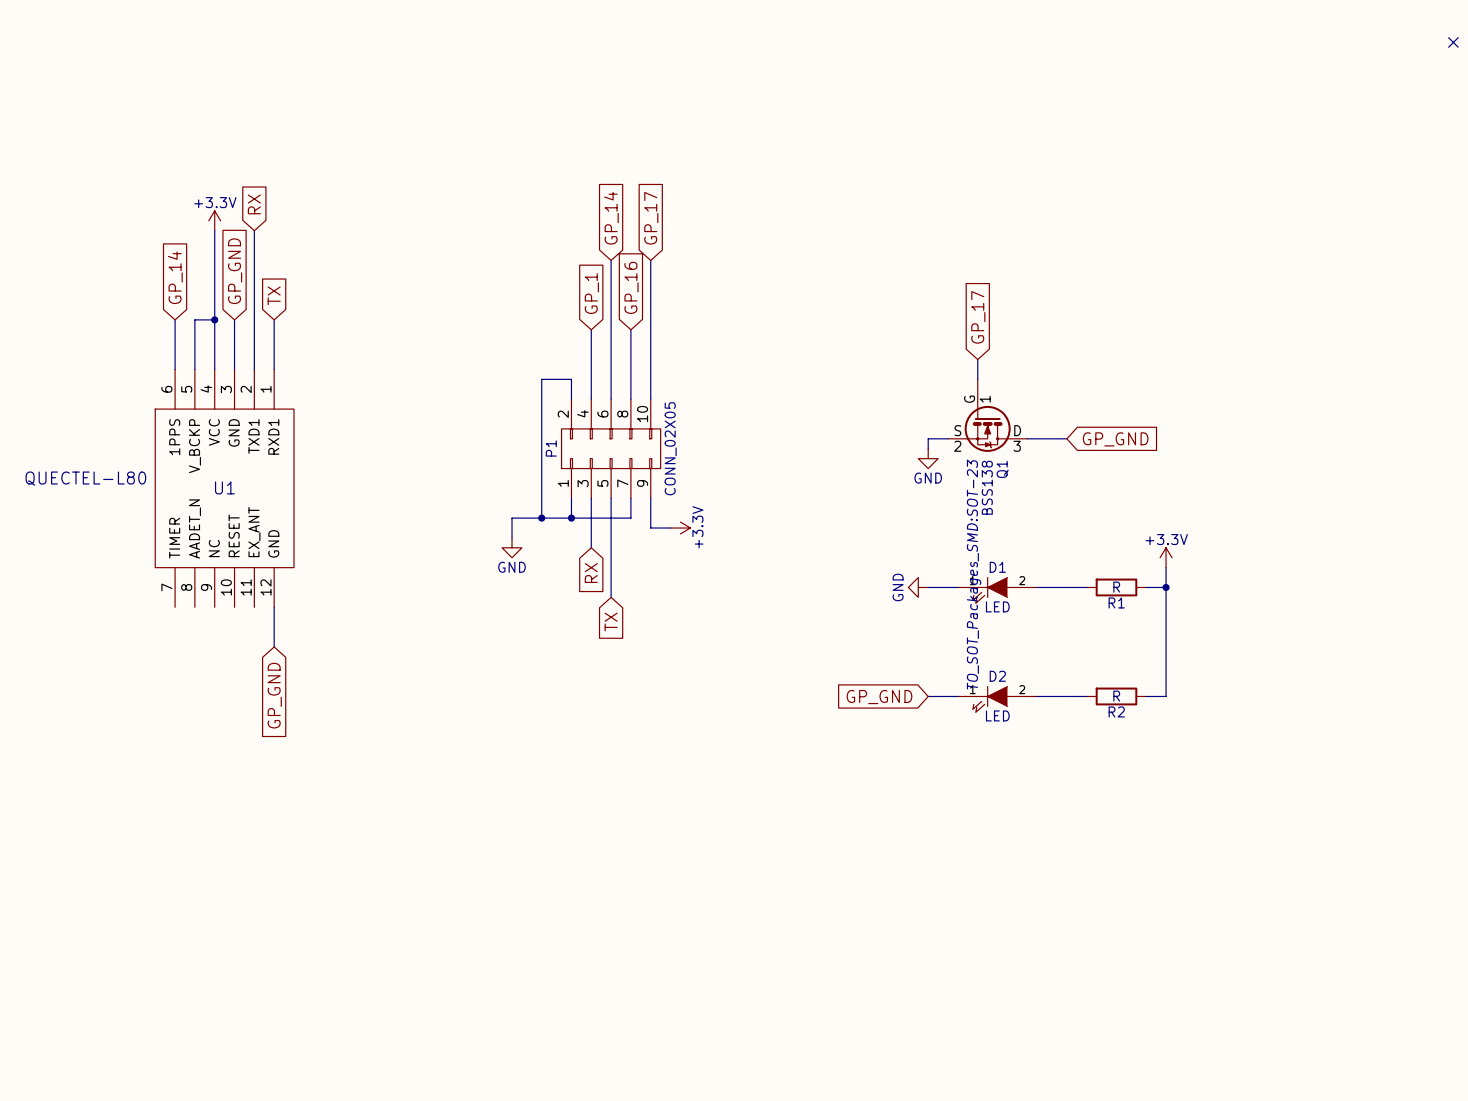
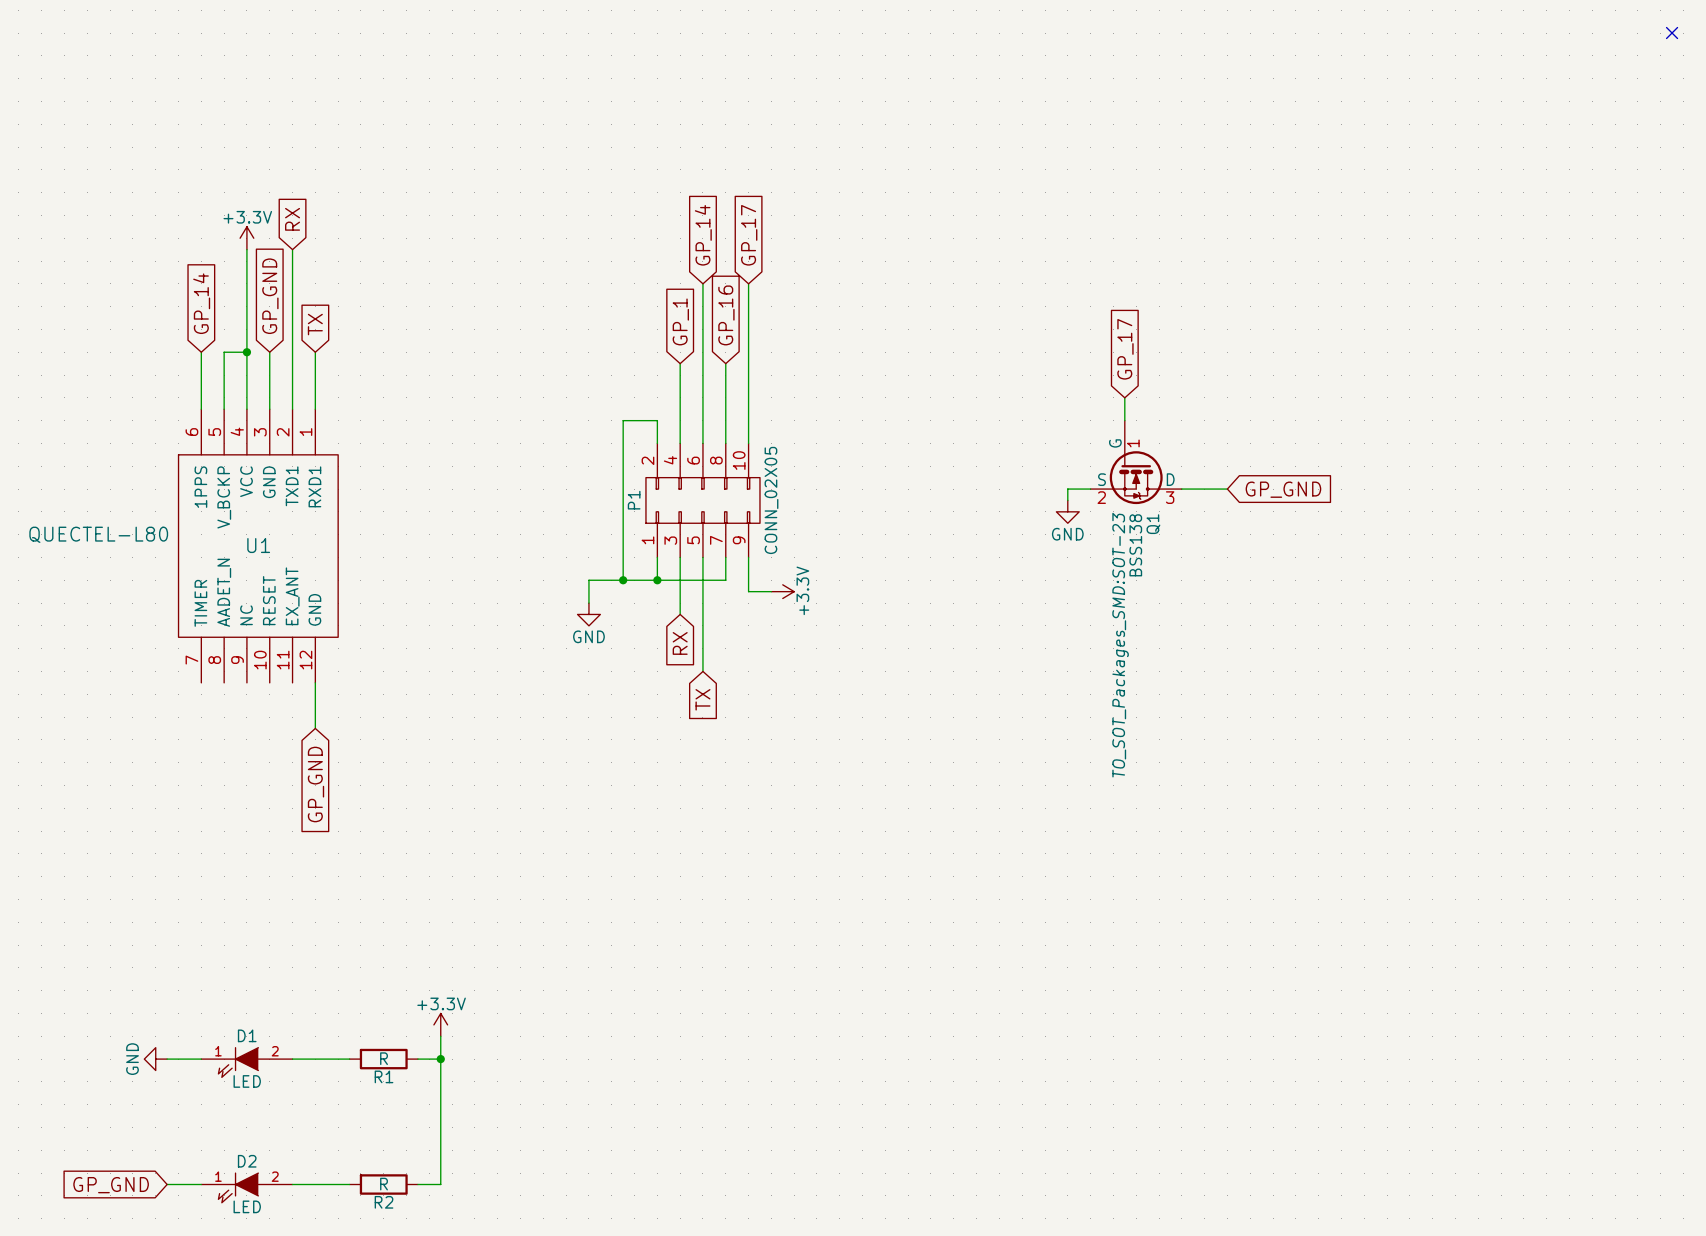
power symbol: +3.3V (1166, 557) -> none
wire: (1166, 567) (1166, 696) (1146, 696) -> none
power symbol: GND (918, 587) -> none
wire: (928, 587) (957, 587) -> none
wire: (1037, 587) (1086, 587) -> none
R1 position: (1116, 587) -> (383, 1059)
wire: (1146, 587) (1166, 587) -> none
junction: (1166, 587) -> none
D1 position: (997, 590) -> (246, 1062)
wire: (928, 696) (957, 696) -> none
wire: (1037, 696) (1086, 696) -> none
R2 position: (1116, 696) -> (383, 1184)
global label: GP_GND (879, 697) -> none
D2 position: (997, 699) -> (246, 1187)
power symbol: none -> +3.3V (440, 1024)
wire: none -> (440, 1036) (440, 1184) (417, 1184)
power symbol: none -> GND (155, 1059)
wire: none -> (167, 1059) (201, 1059)
wire: none -> (292, 1059) (349, 1059)
wire: none -> (417, 1059) (440, 1059)
junction: none -> (440, 1059)
global label: none -> GP_GND (111, 1185)
wire: none -> (167, 1184) (201, 1184)
wire: none -> (292, 1184) (349, 1184)

